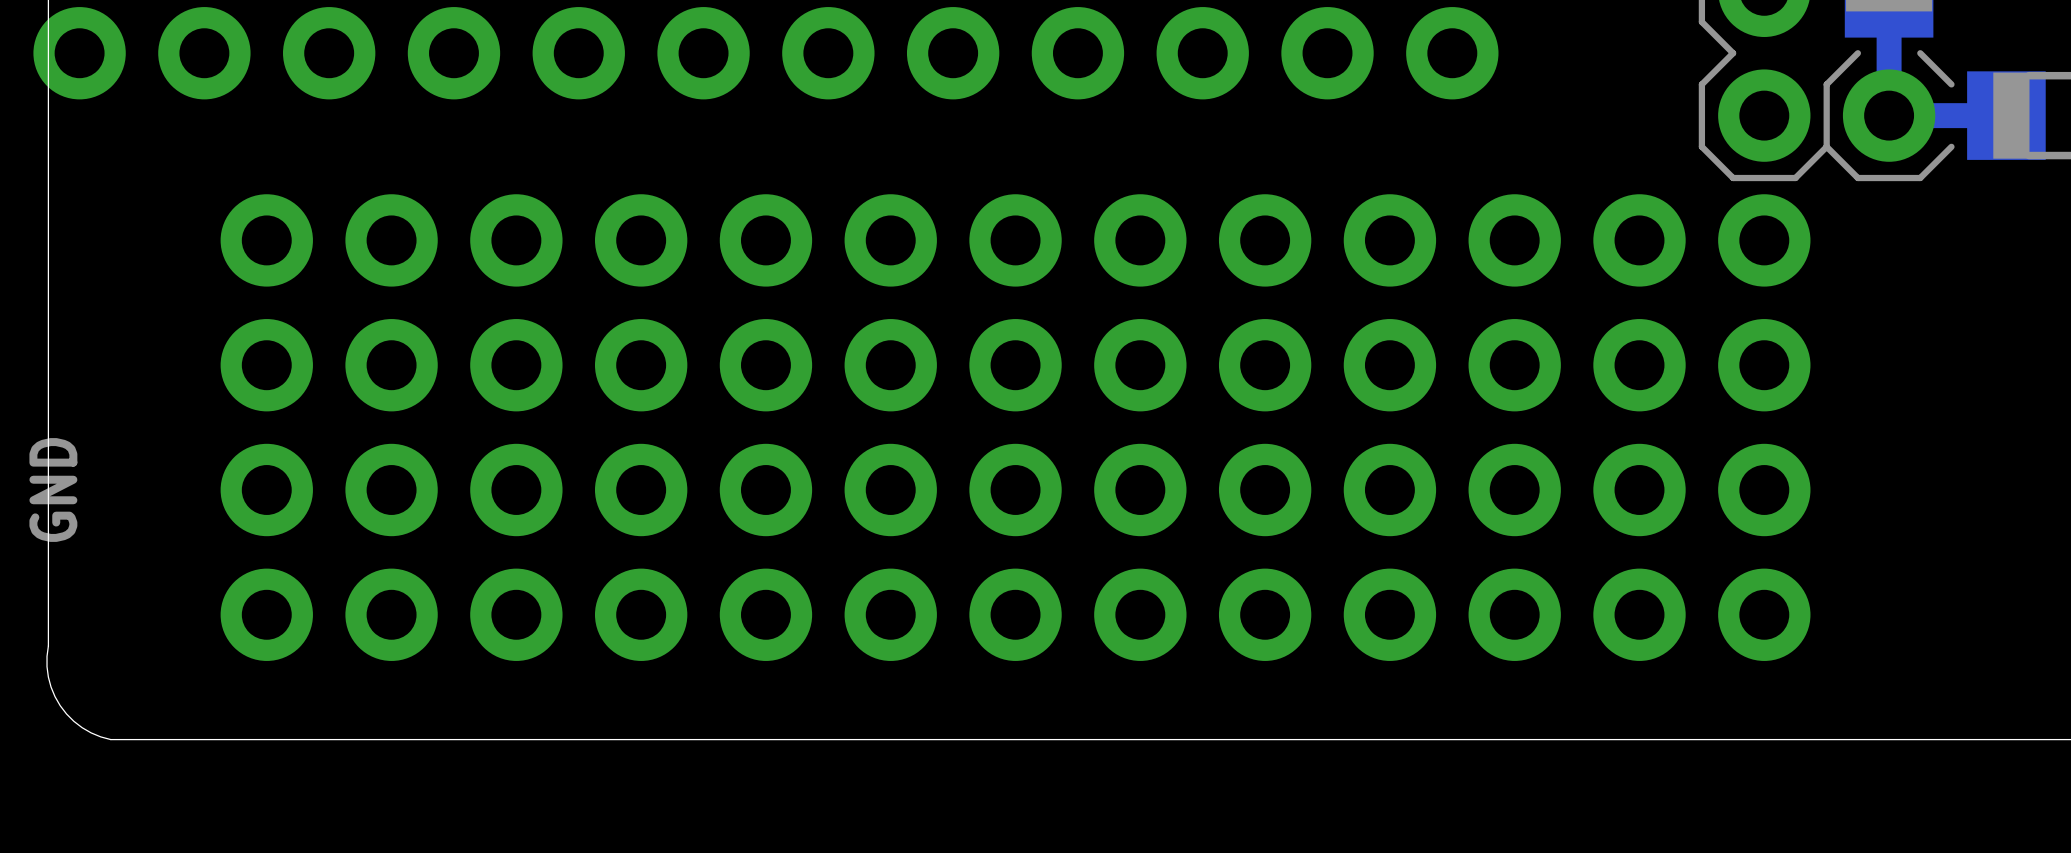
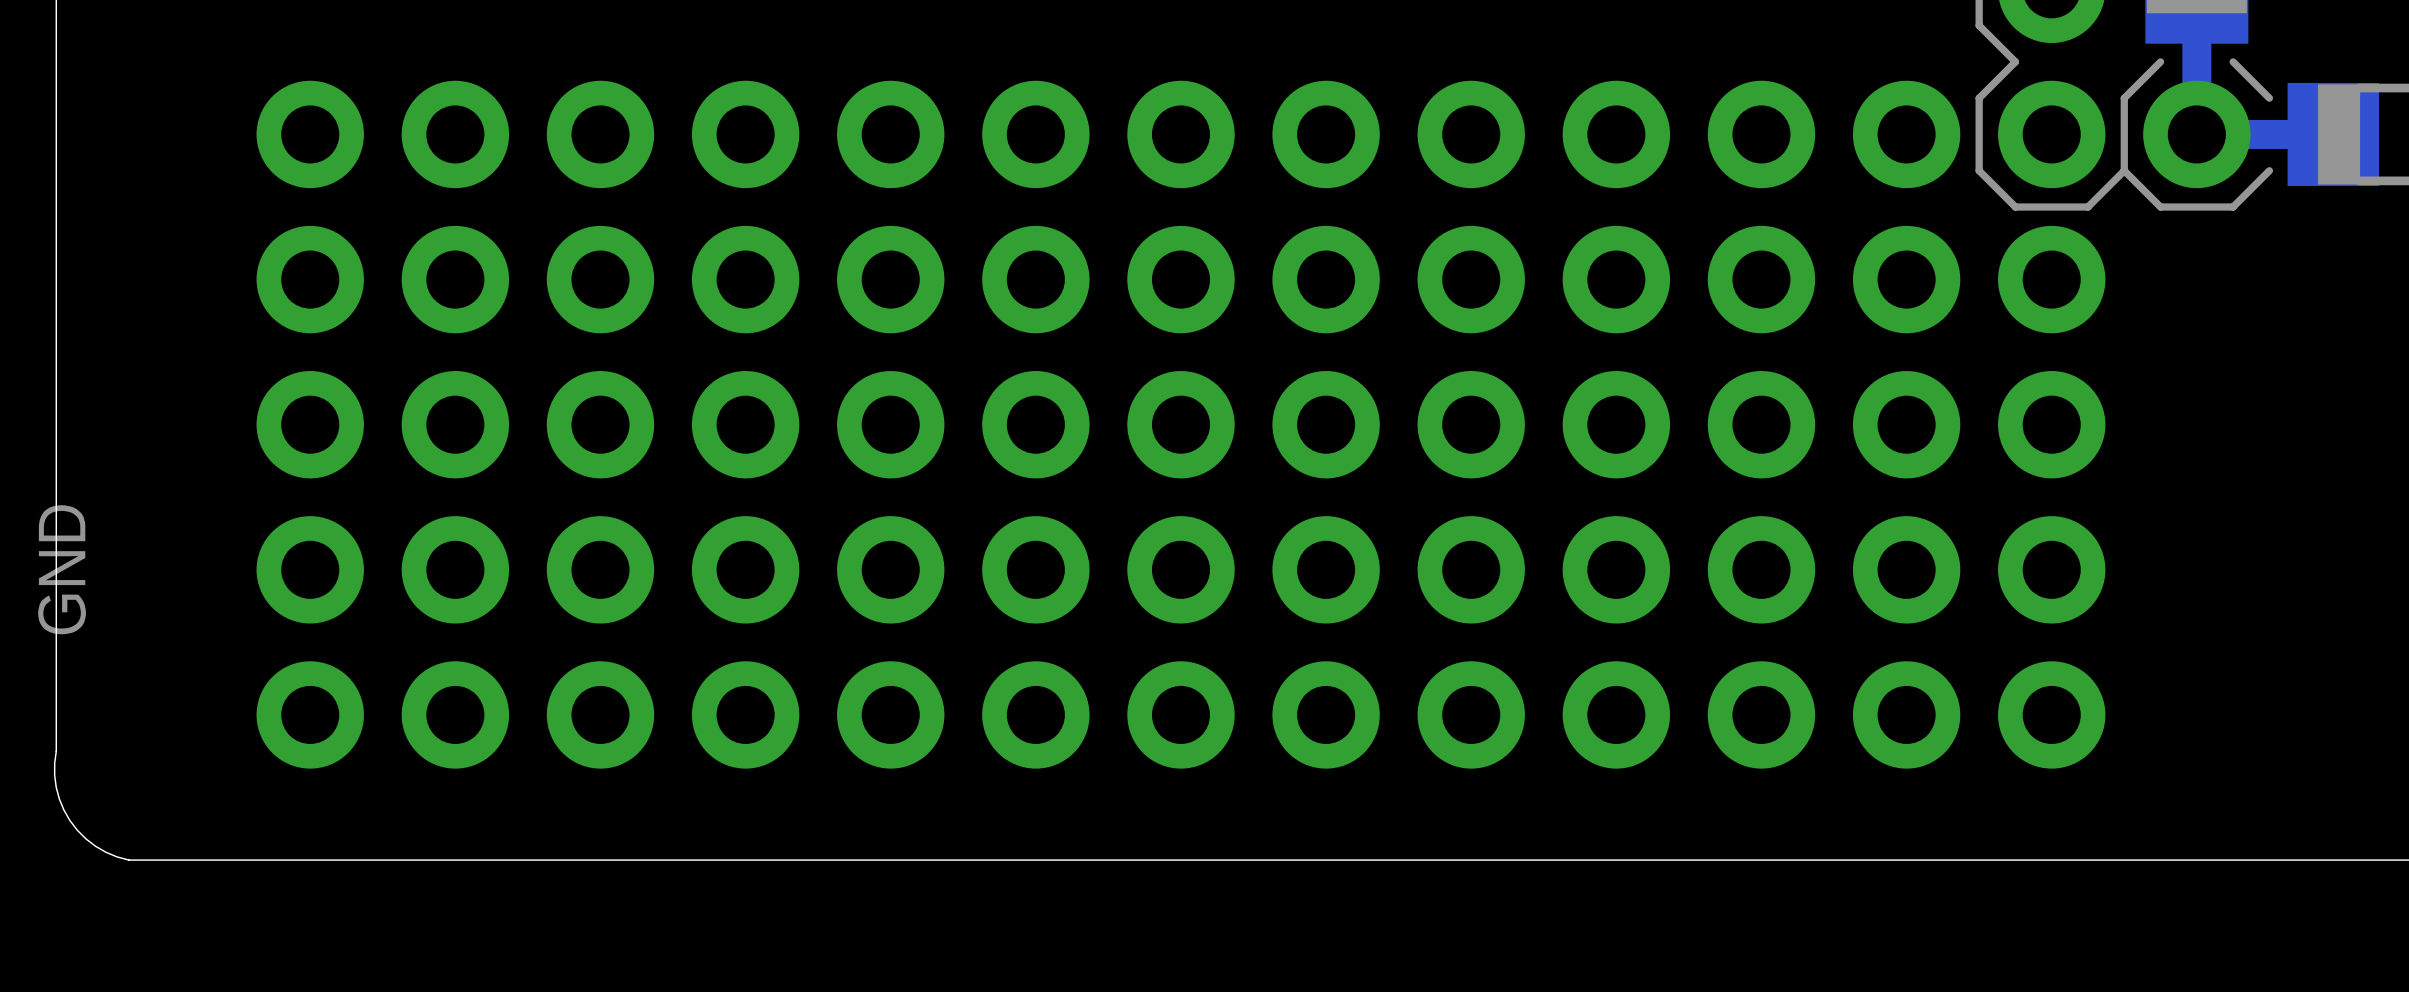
part position: (765, 53) -> (1108, 134)

